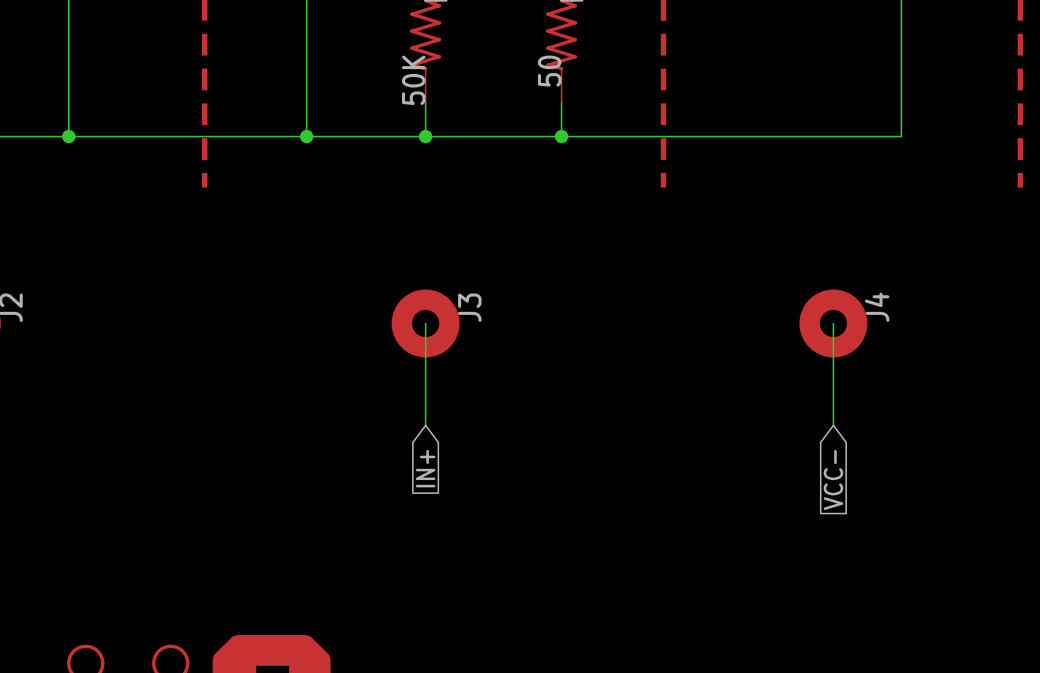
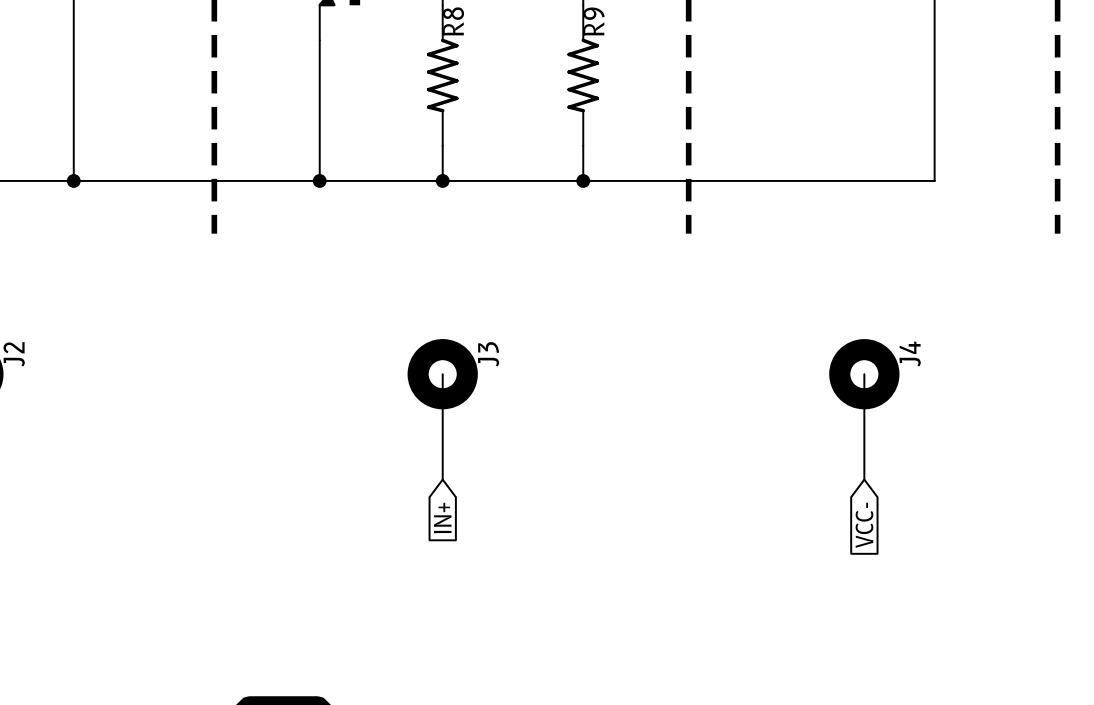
R9 value: 50 (549, 71) -> none
R8 value: 50K (413, 80) -> none

